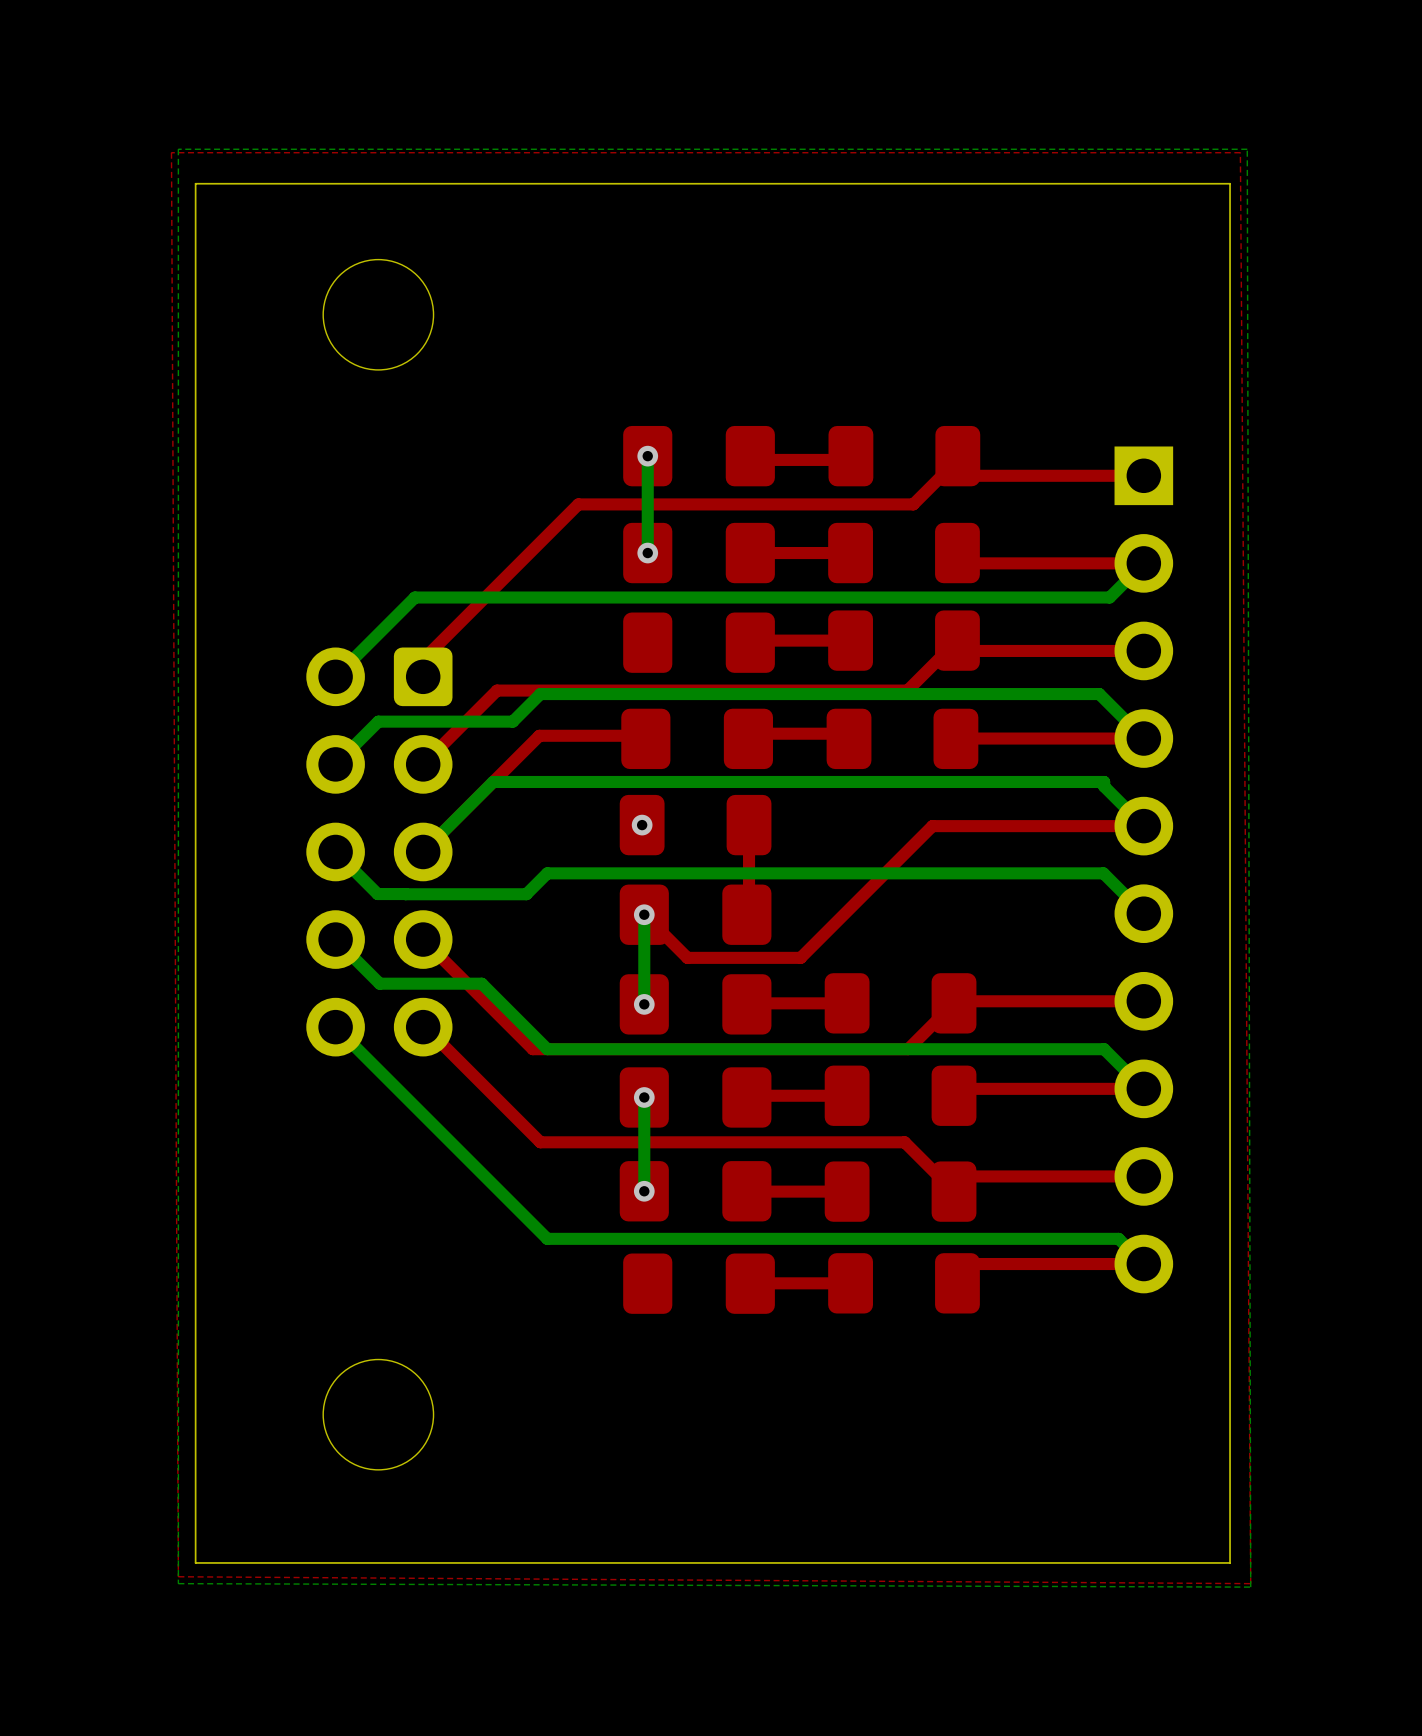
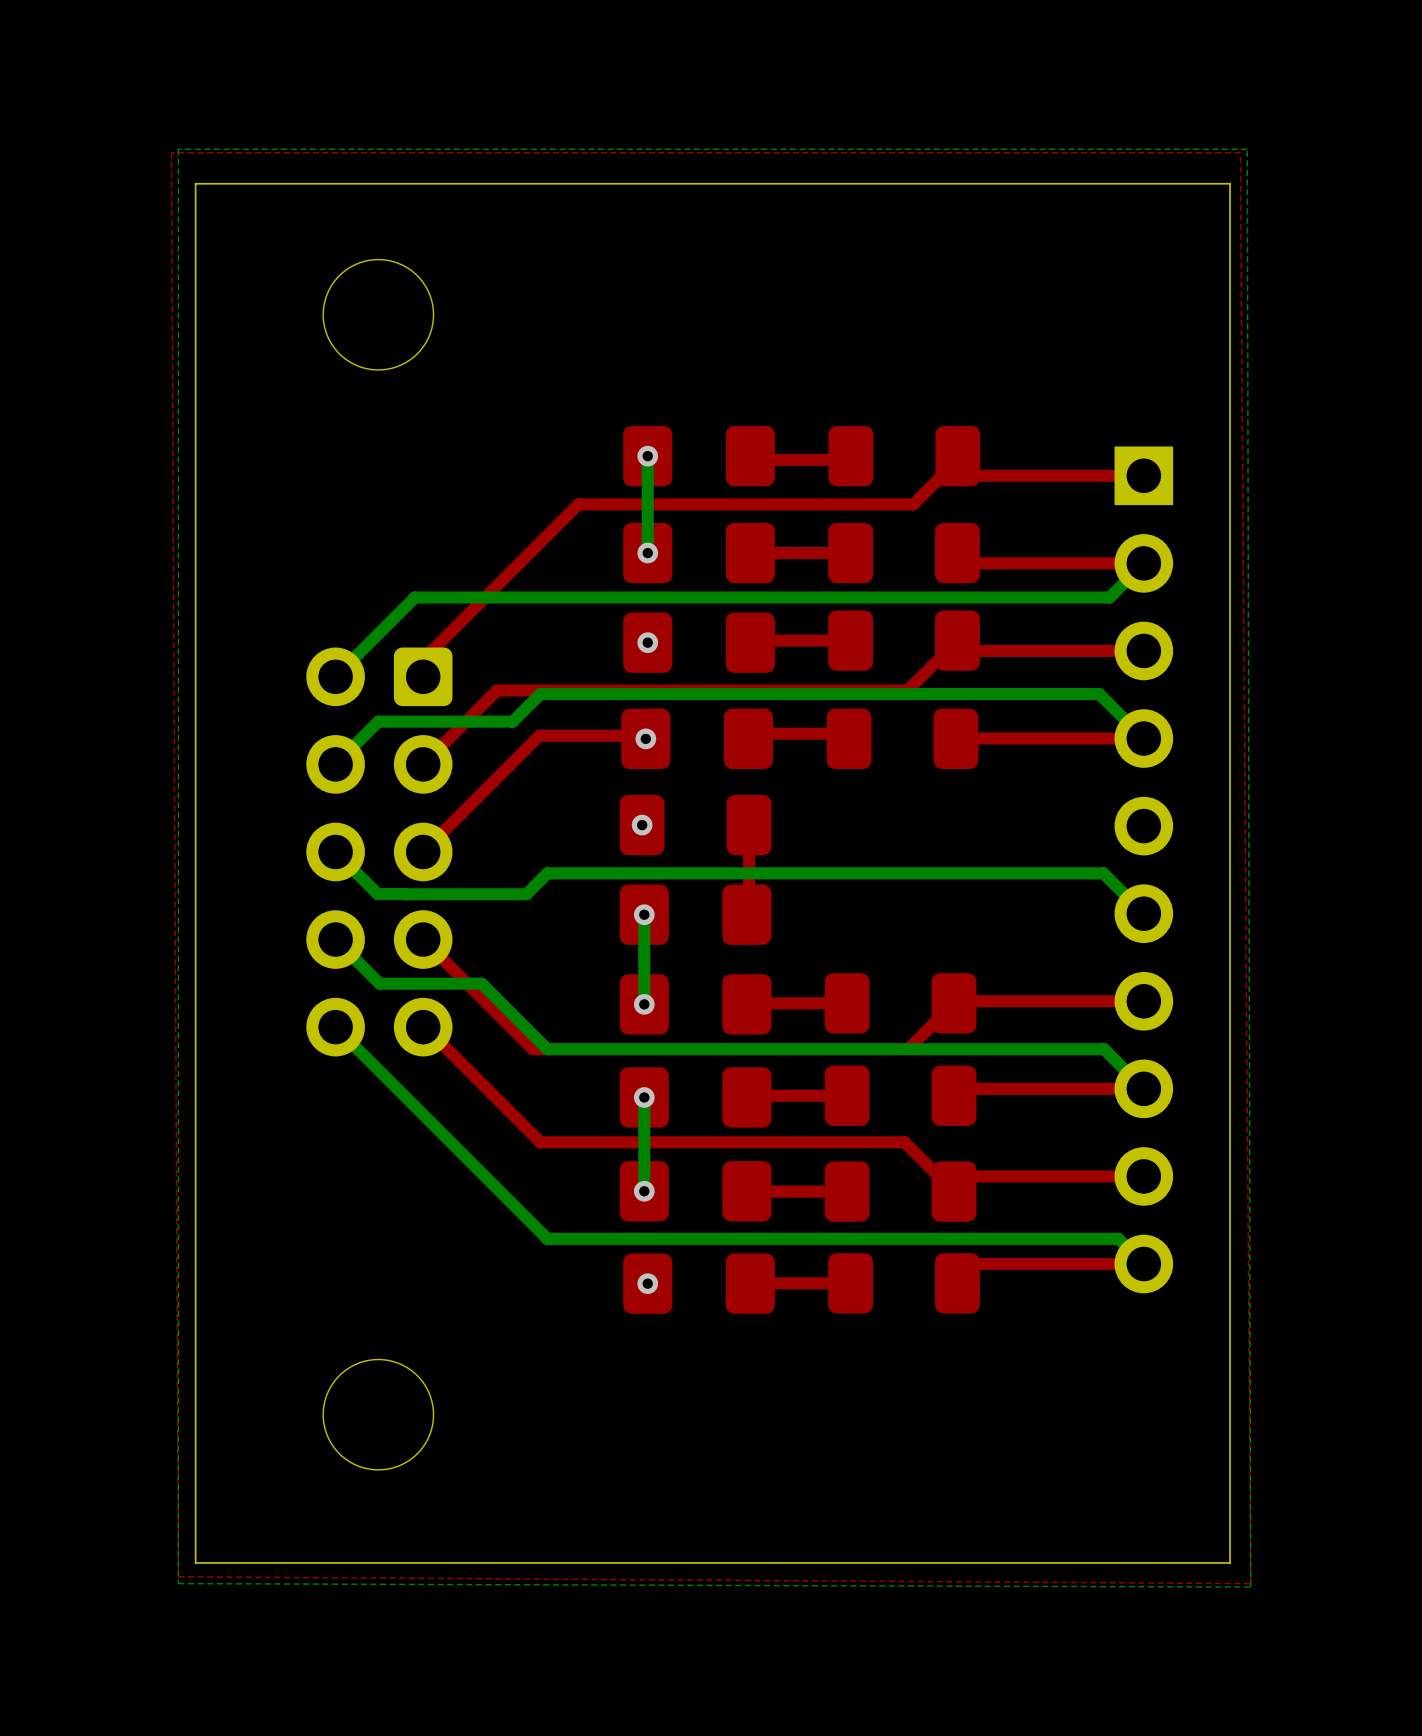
via: none -> (647, 642)
via: none -> (645, 738)
bottom track: (1143, 826) (1104, 786) (1104, 781) (493, 781) (423, 851) -> none
top track: (1143, 826) (932, 826) (800, 957) (687, 957) (644, 914) -> none
via: none -> (647, 1283)

